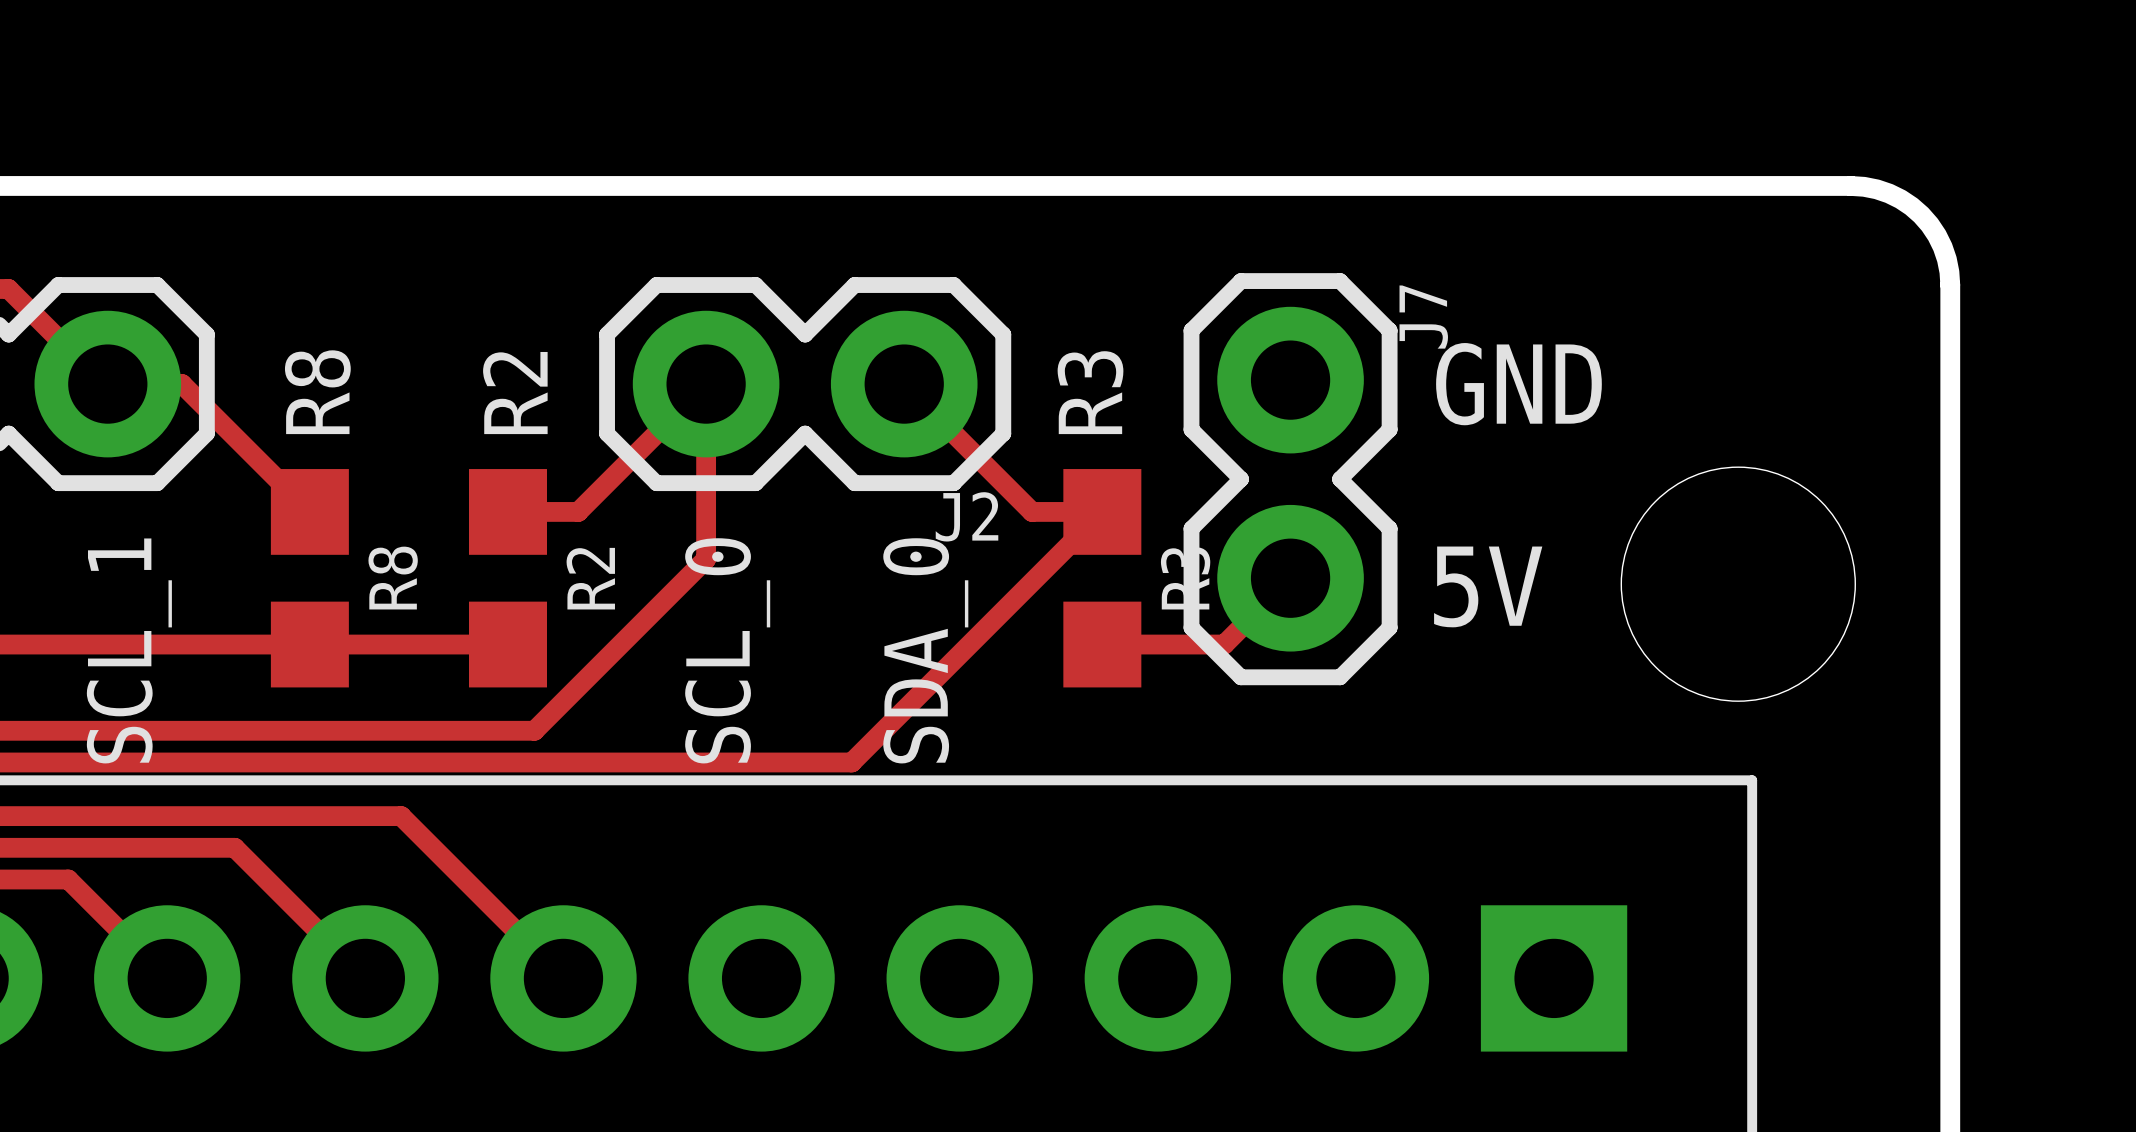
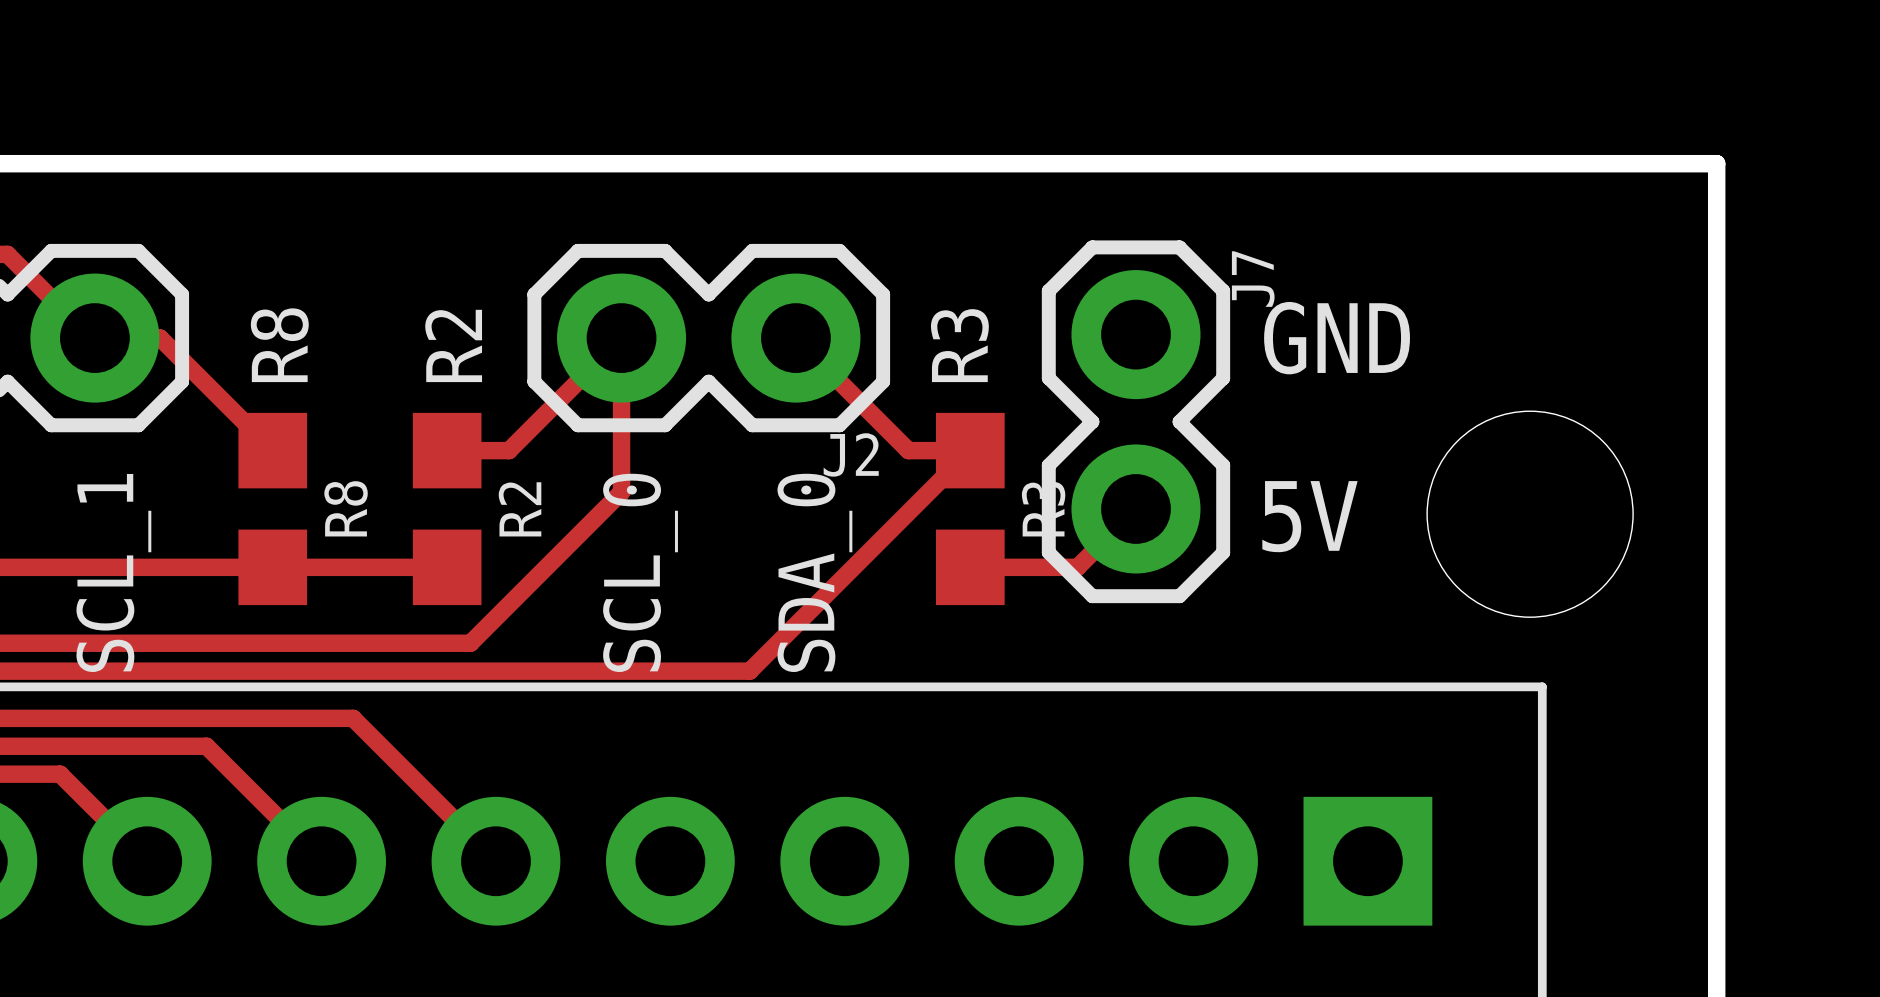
board edge: (1851, 185) (1876, 189) (1889, 193) (1900, 199) (1921, 214) (1937, 235) (1942, 247) (1946, 259) (1950, 285) -> (1629, 163) (1716, 163) (1716, 250)

